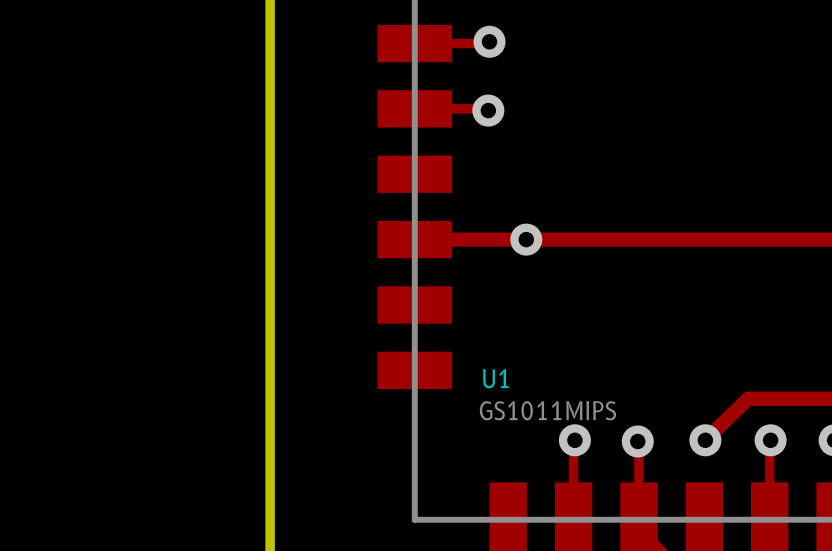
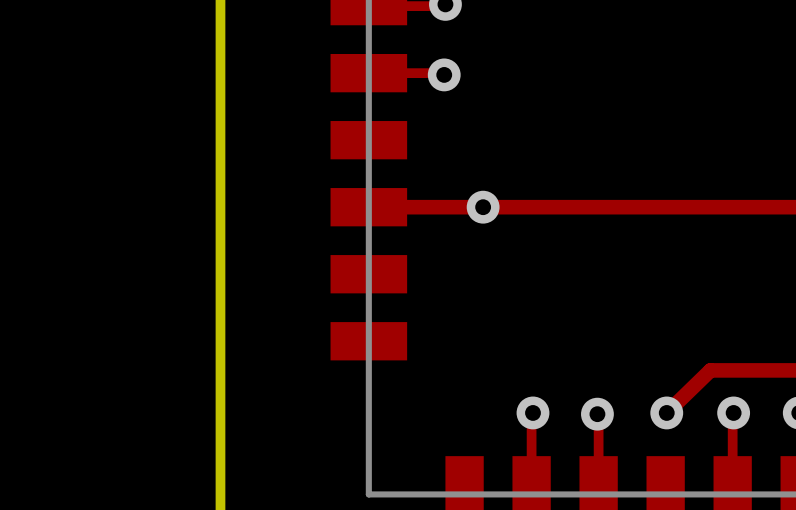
U1 name: U1 (495, 378) -> none
U1 value: GS1011MIPS (547, 410) -> none

